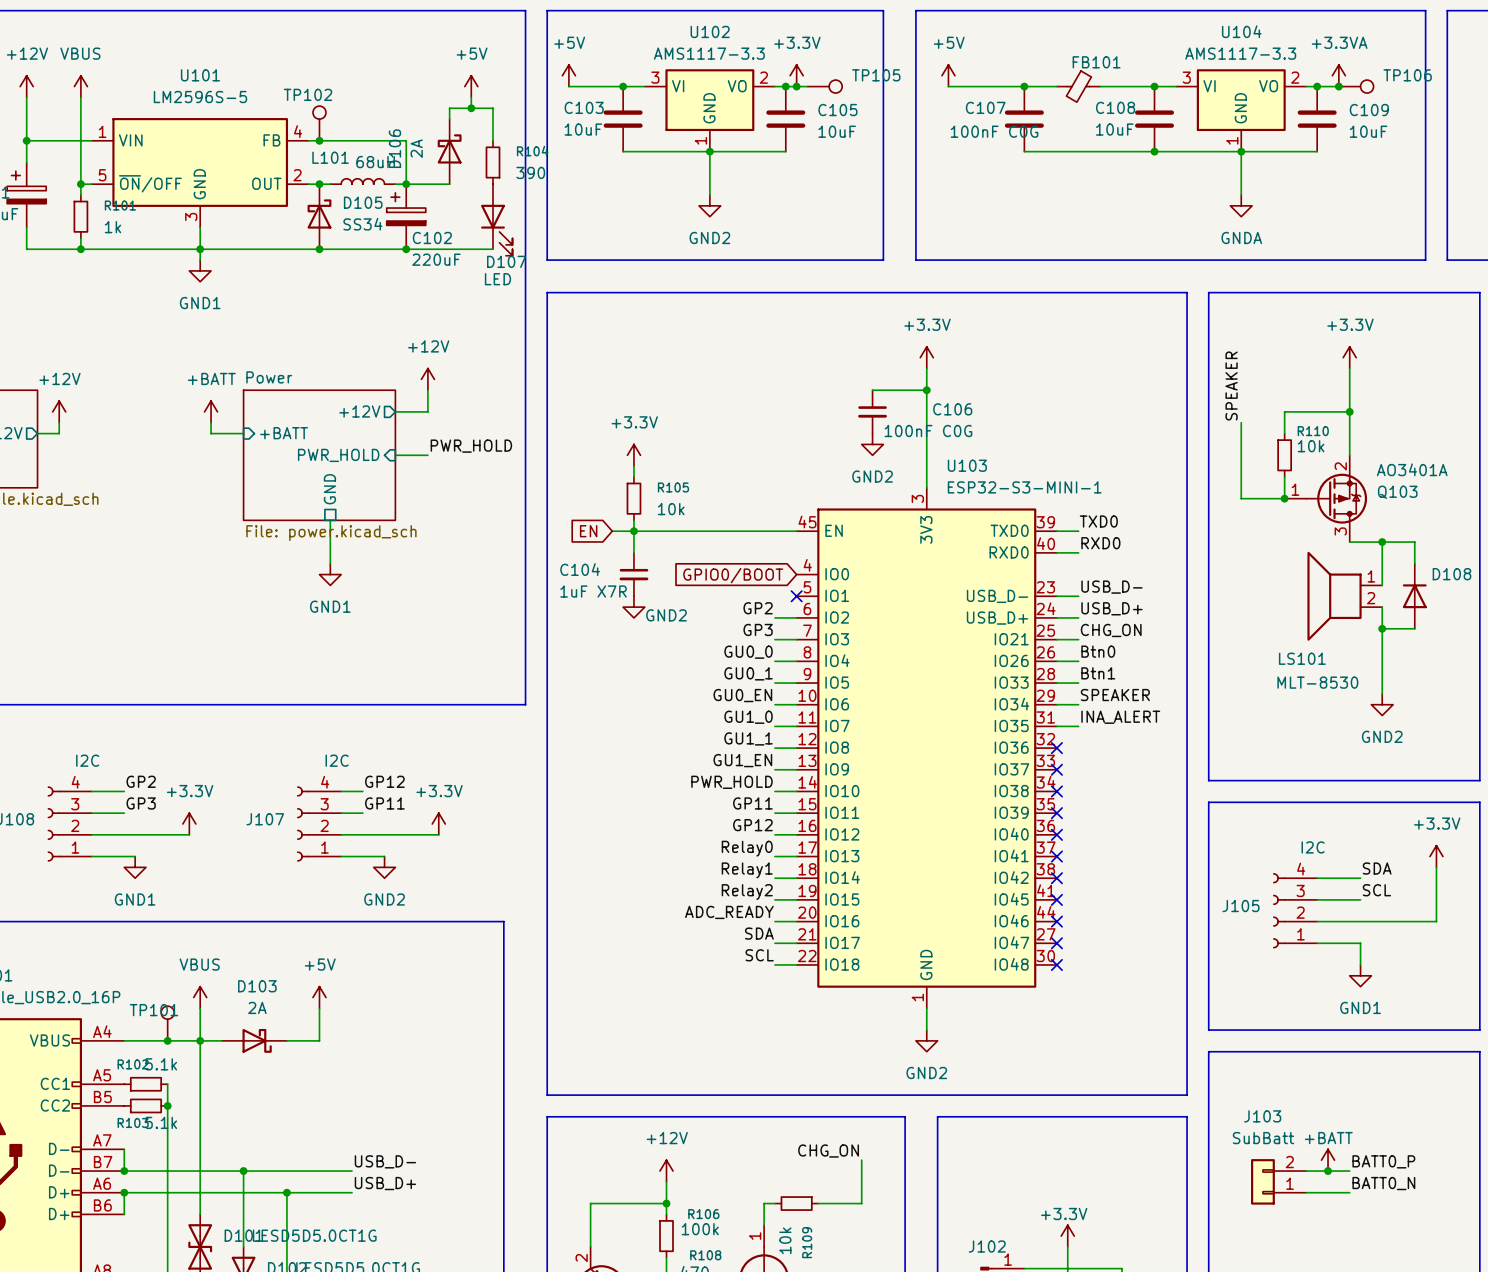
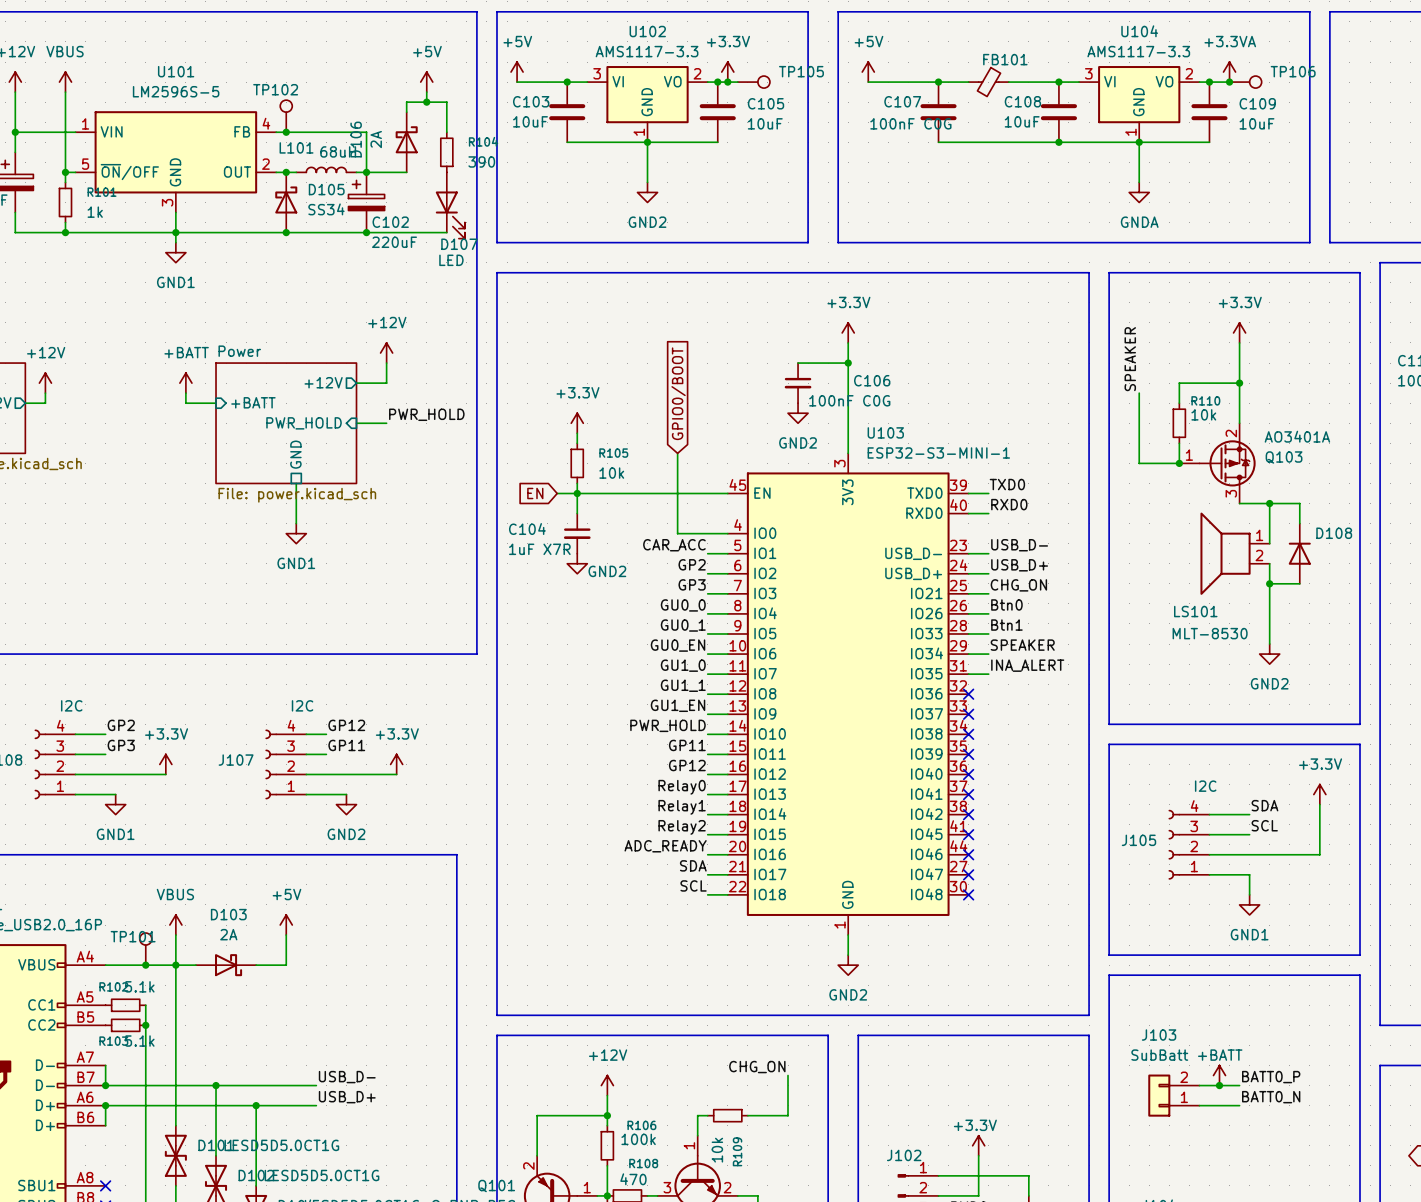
wire: none -> (677, 453) (677, 533) (727, 533)
global label rotation: 0° (733, 575) -> 90° clockwise (678, 393)
global label position: GPIO0/BOOT (733, 575) -> GPIO0/BOOT (678, 393)
label: none -> CAR_ACC (674, 545)
wire: none -> (707, 553) (727, 553)
no-connect mark: (796, 596) -> none

